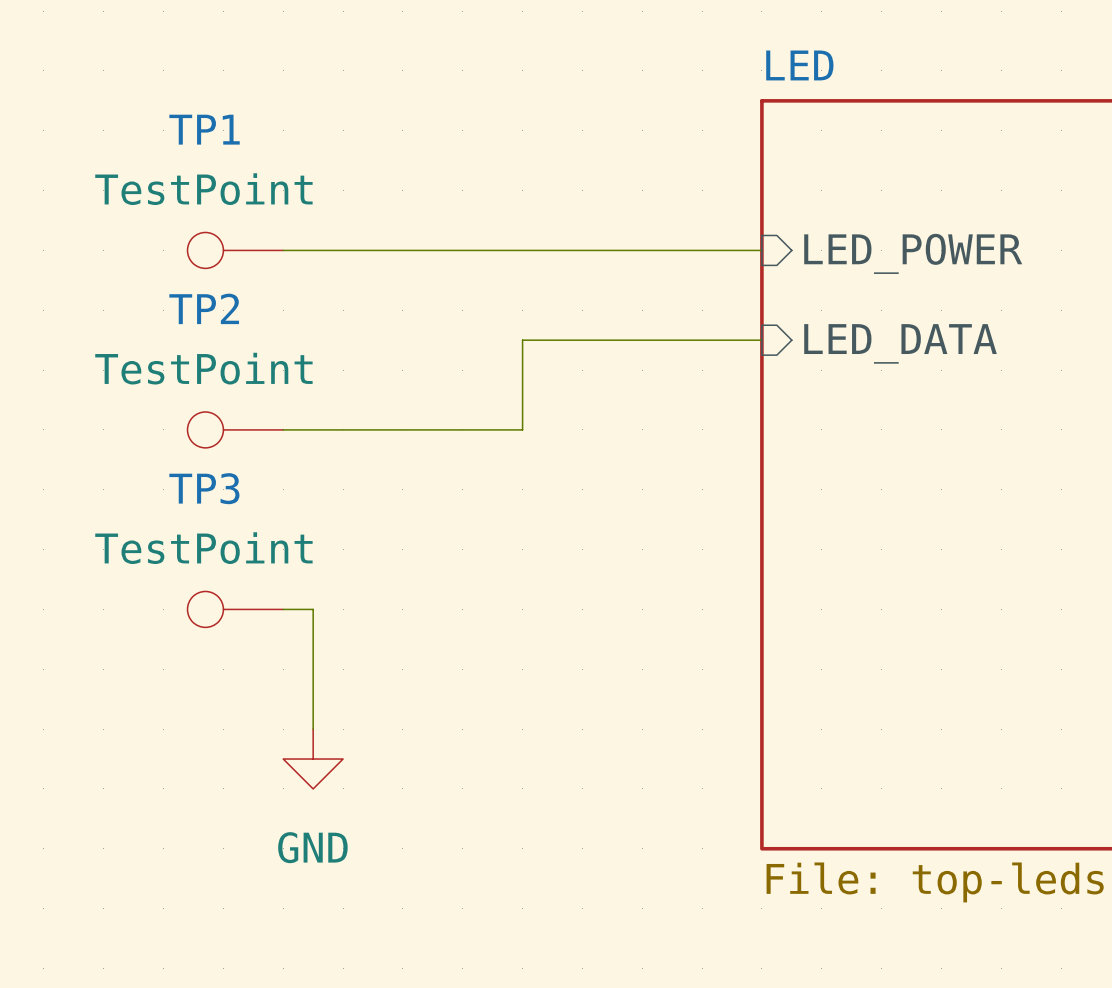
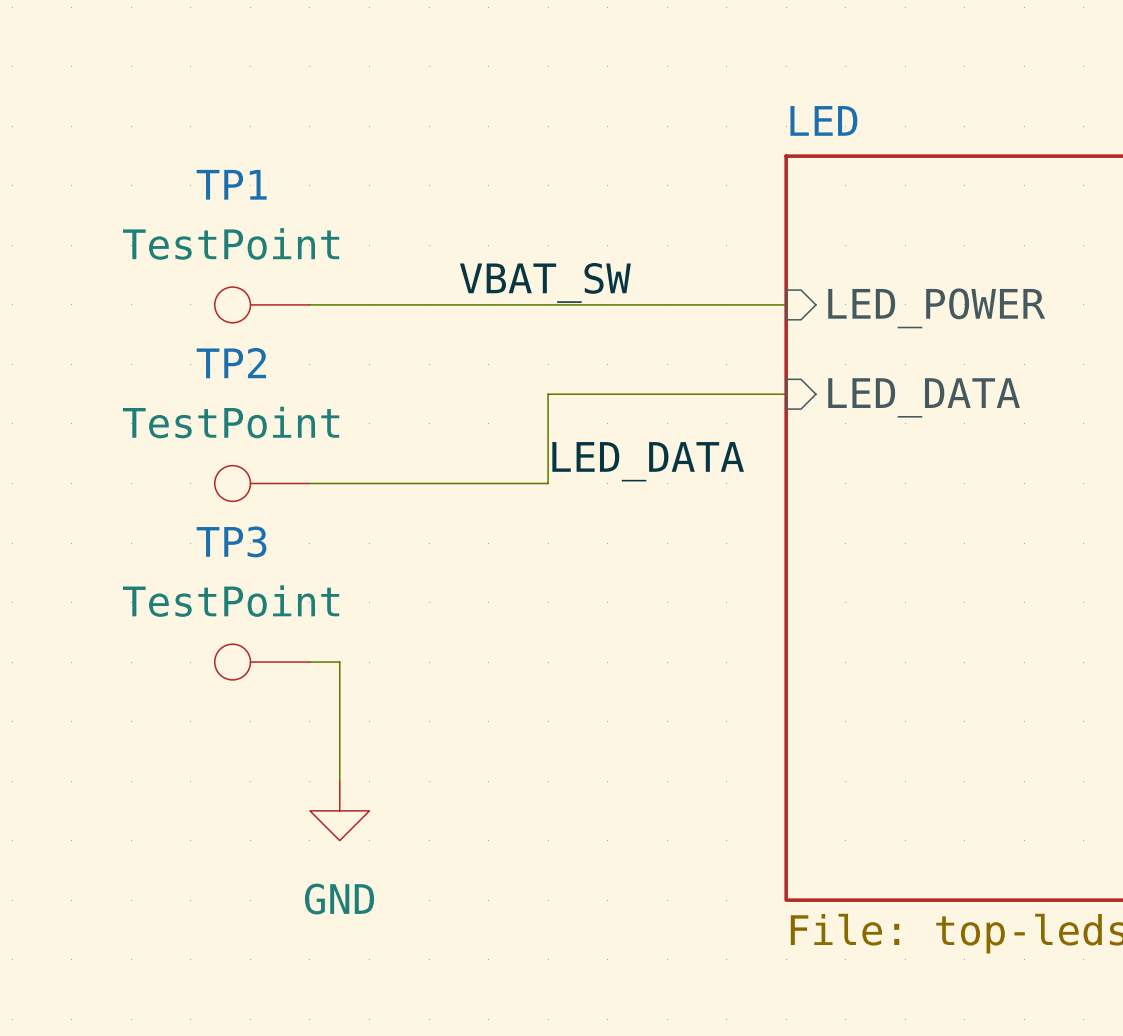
label: none -> VBAT_SW (545, 282)
label: none -> LED_DATA (648, 461)

